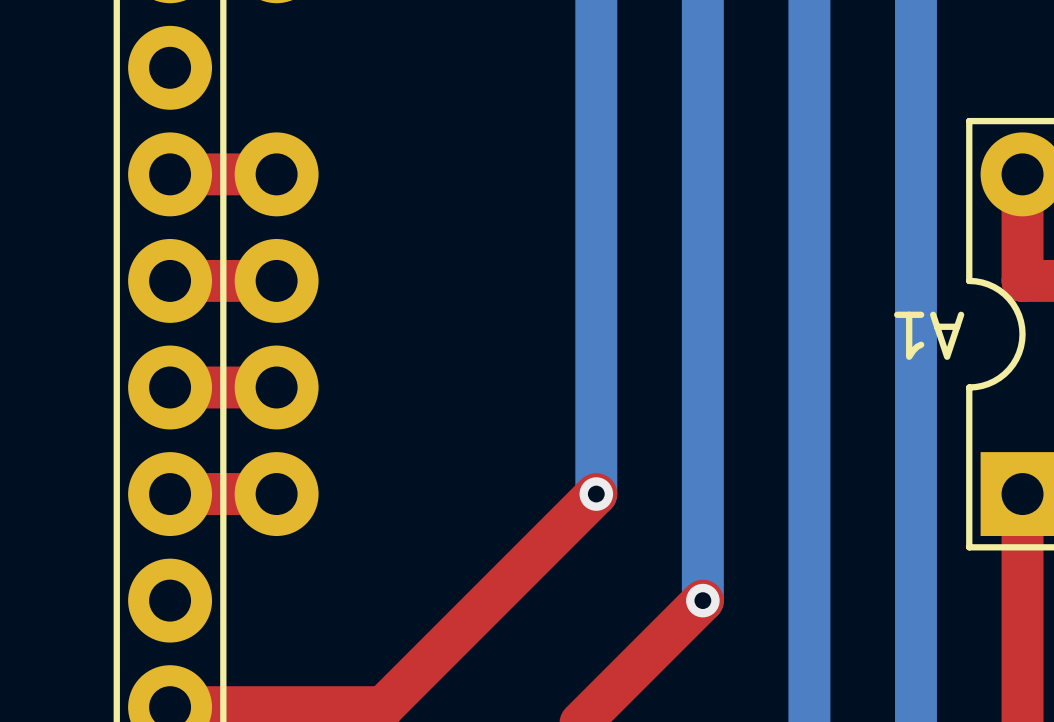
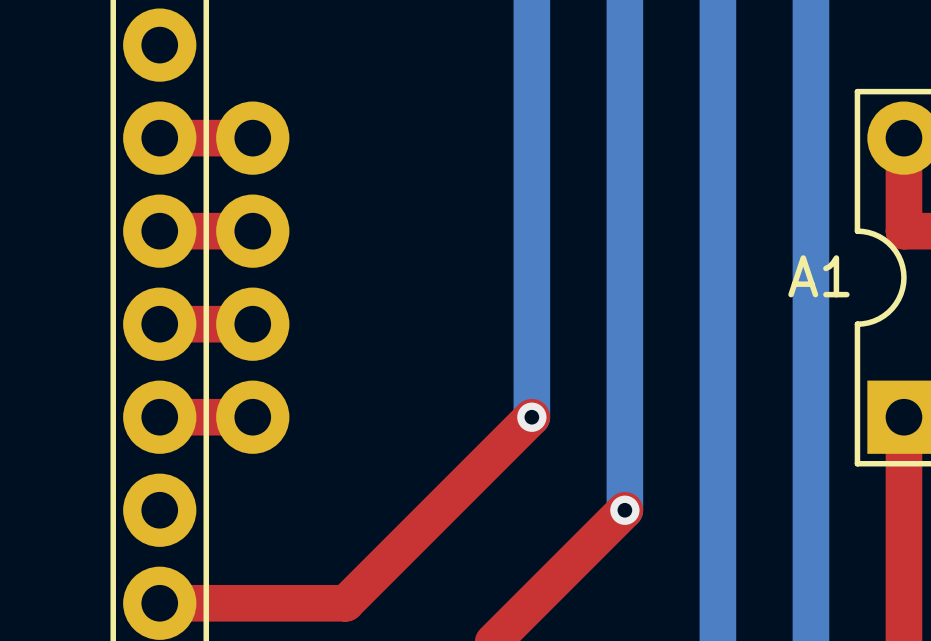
A1 name rotation: 0° (929, 335) -> 180° (818, 276)

